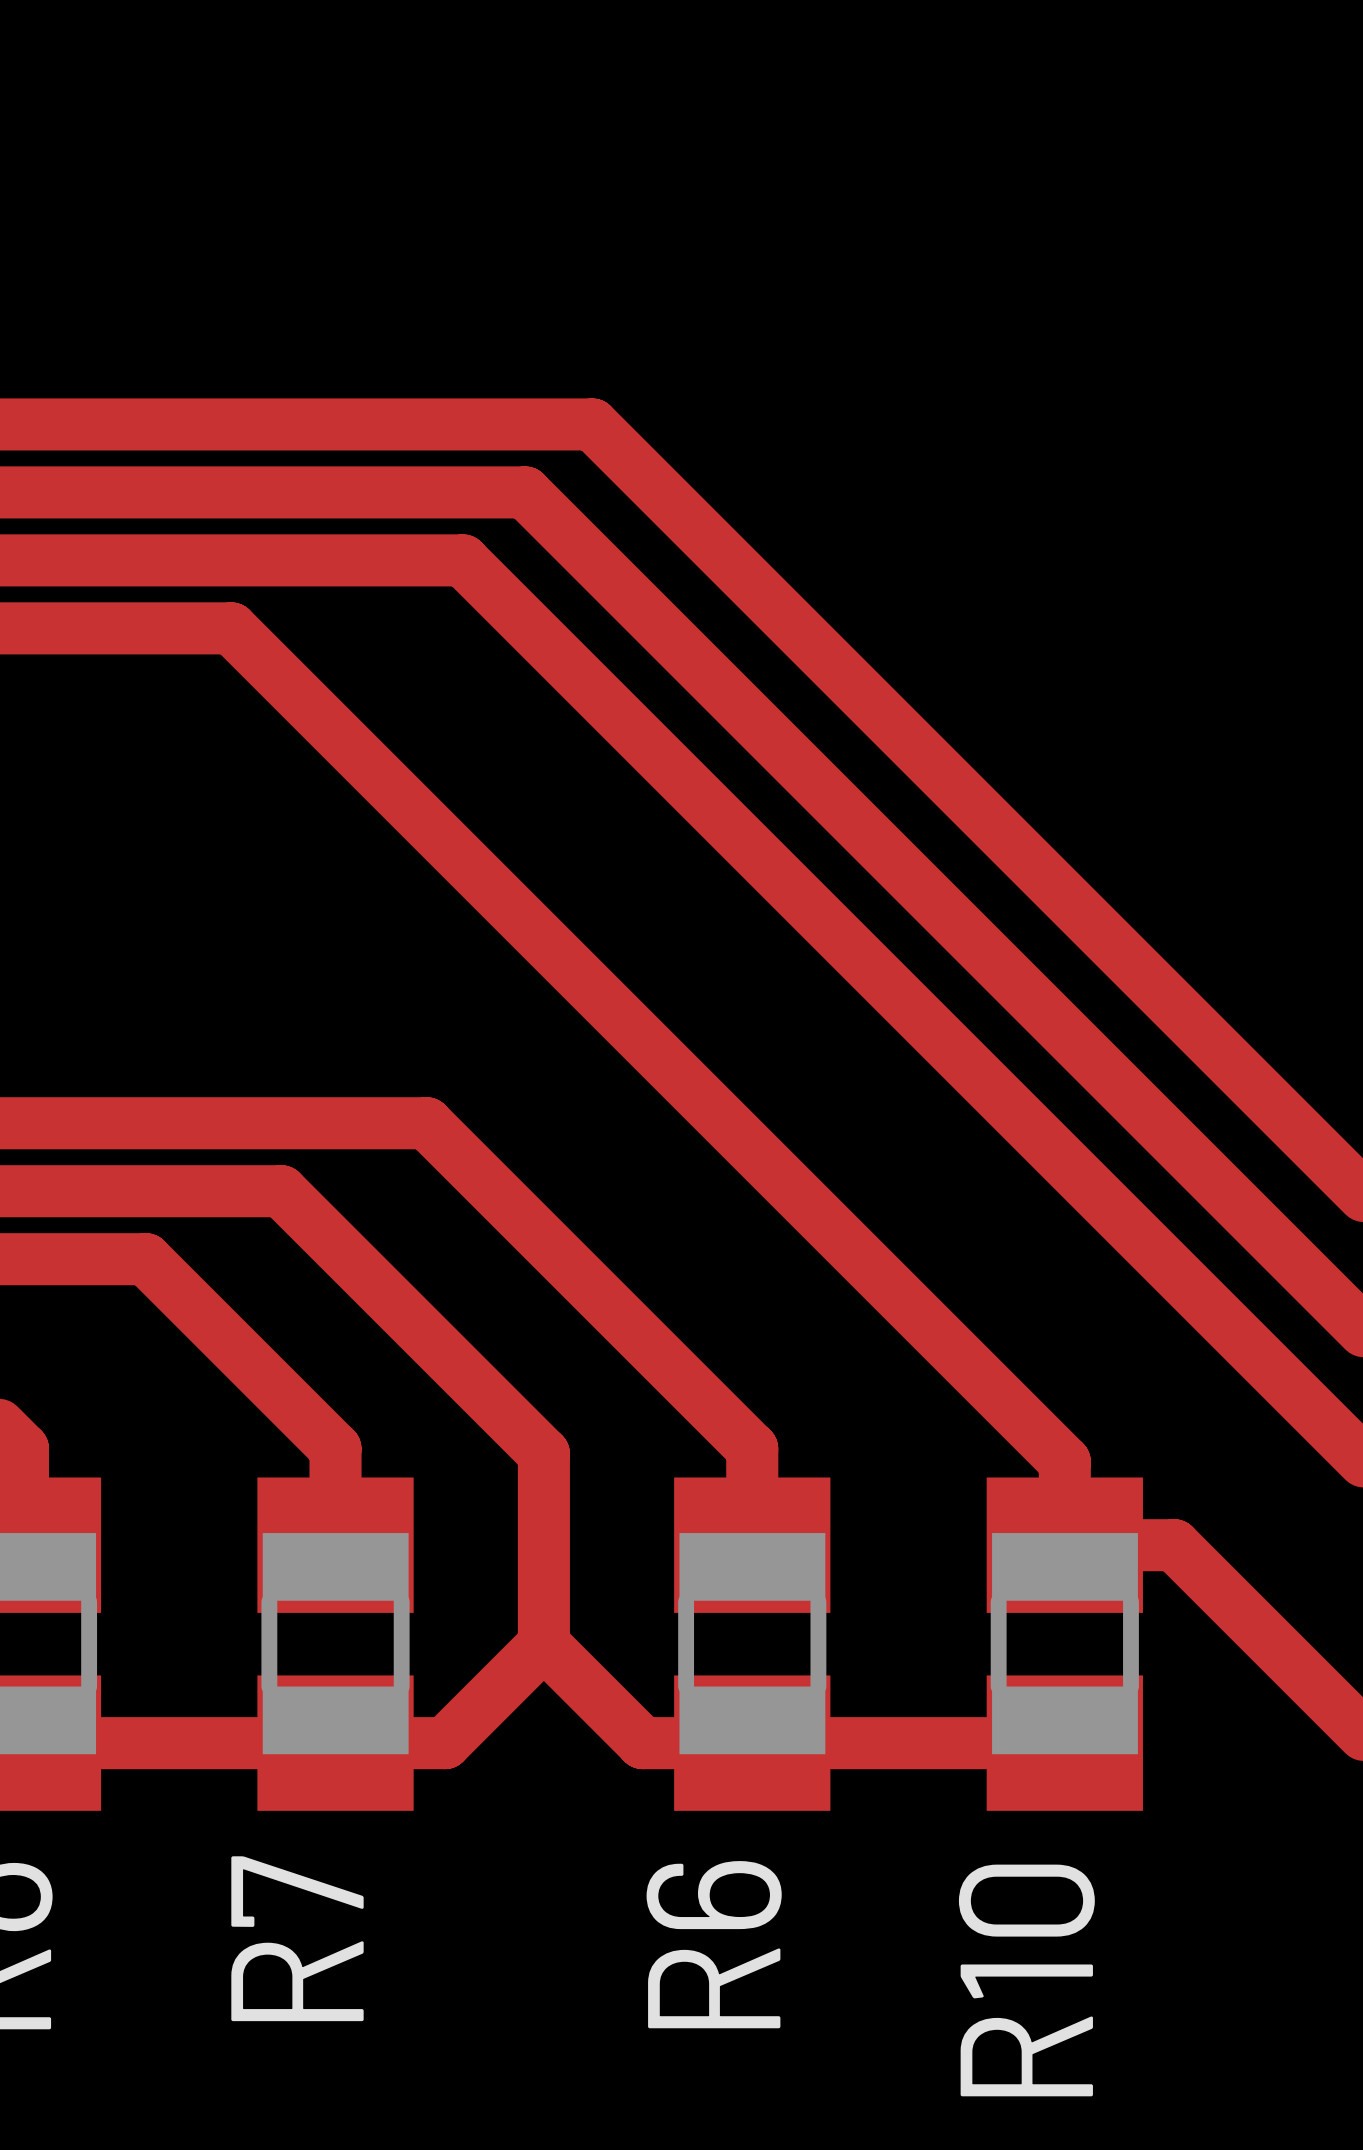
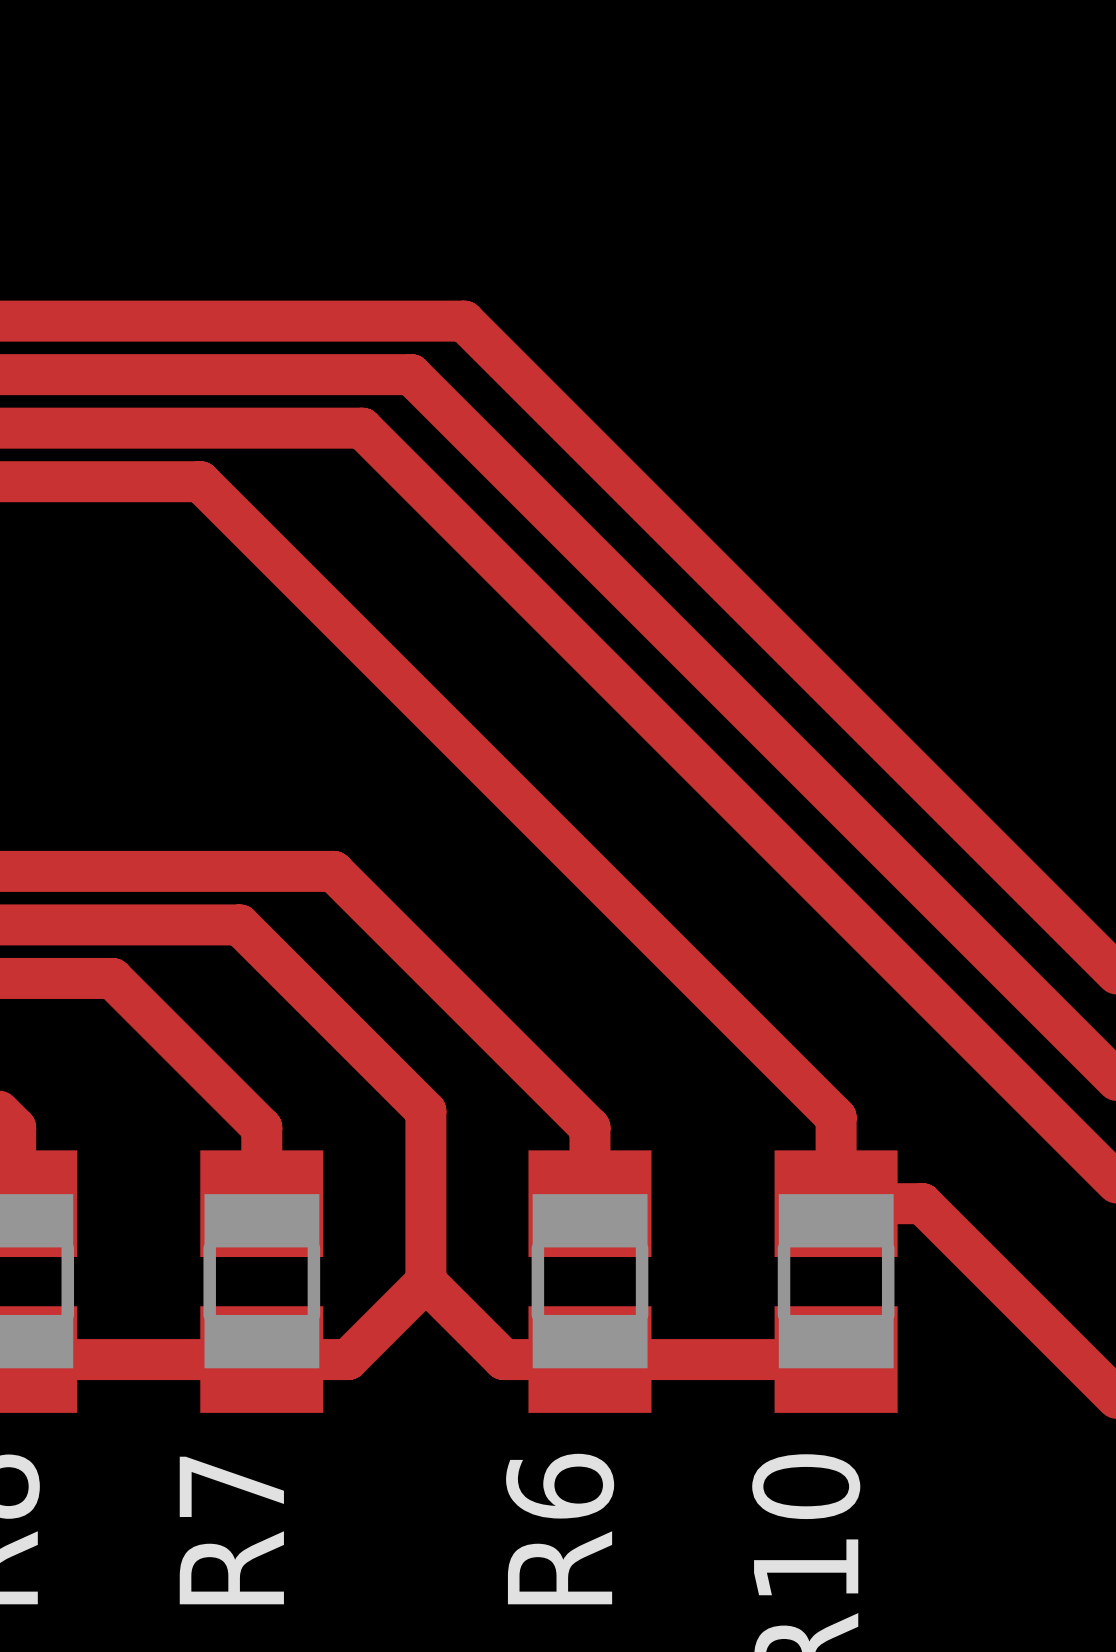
top track: (231, 628) (1064, 1461) -> (179, 481) (200, 481) (836, 1117) (836, 1138)
top track: (281, 1191) (543, 1453) -> (219, 924) (239, 924) (425, 1111) (425, 1131)

